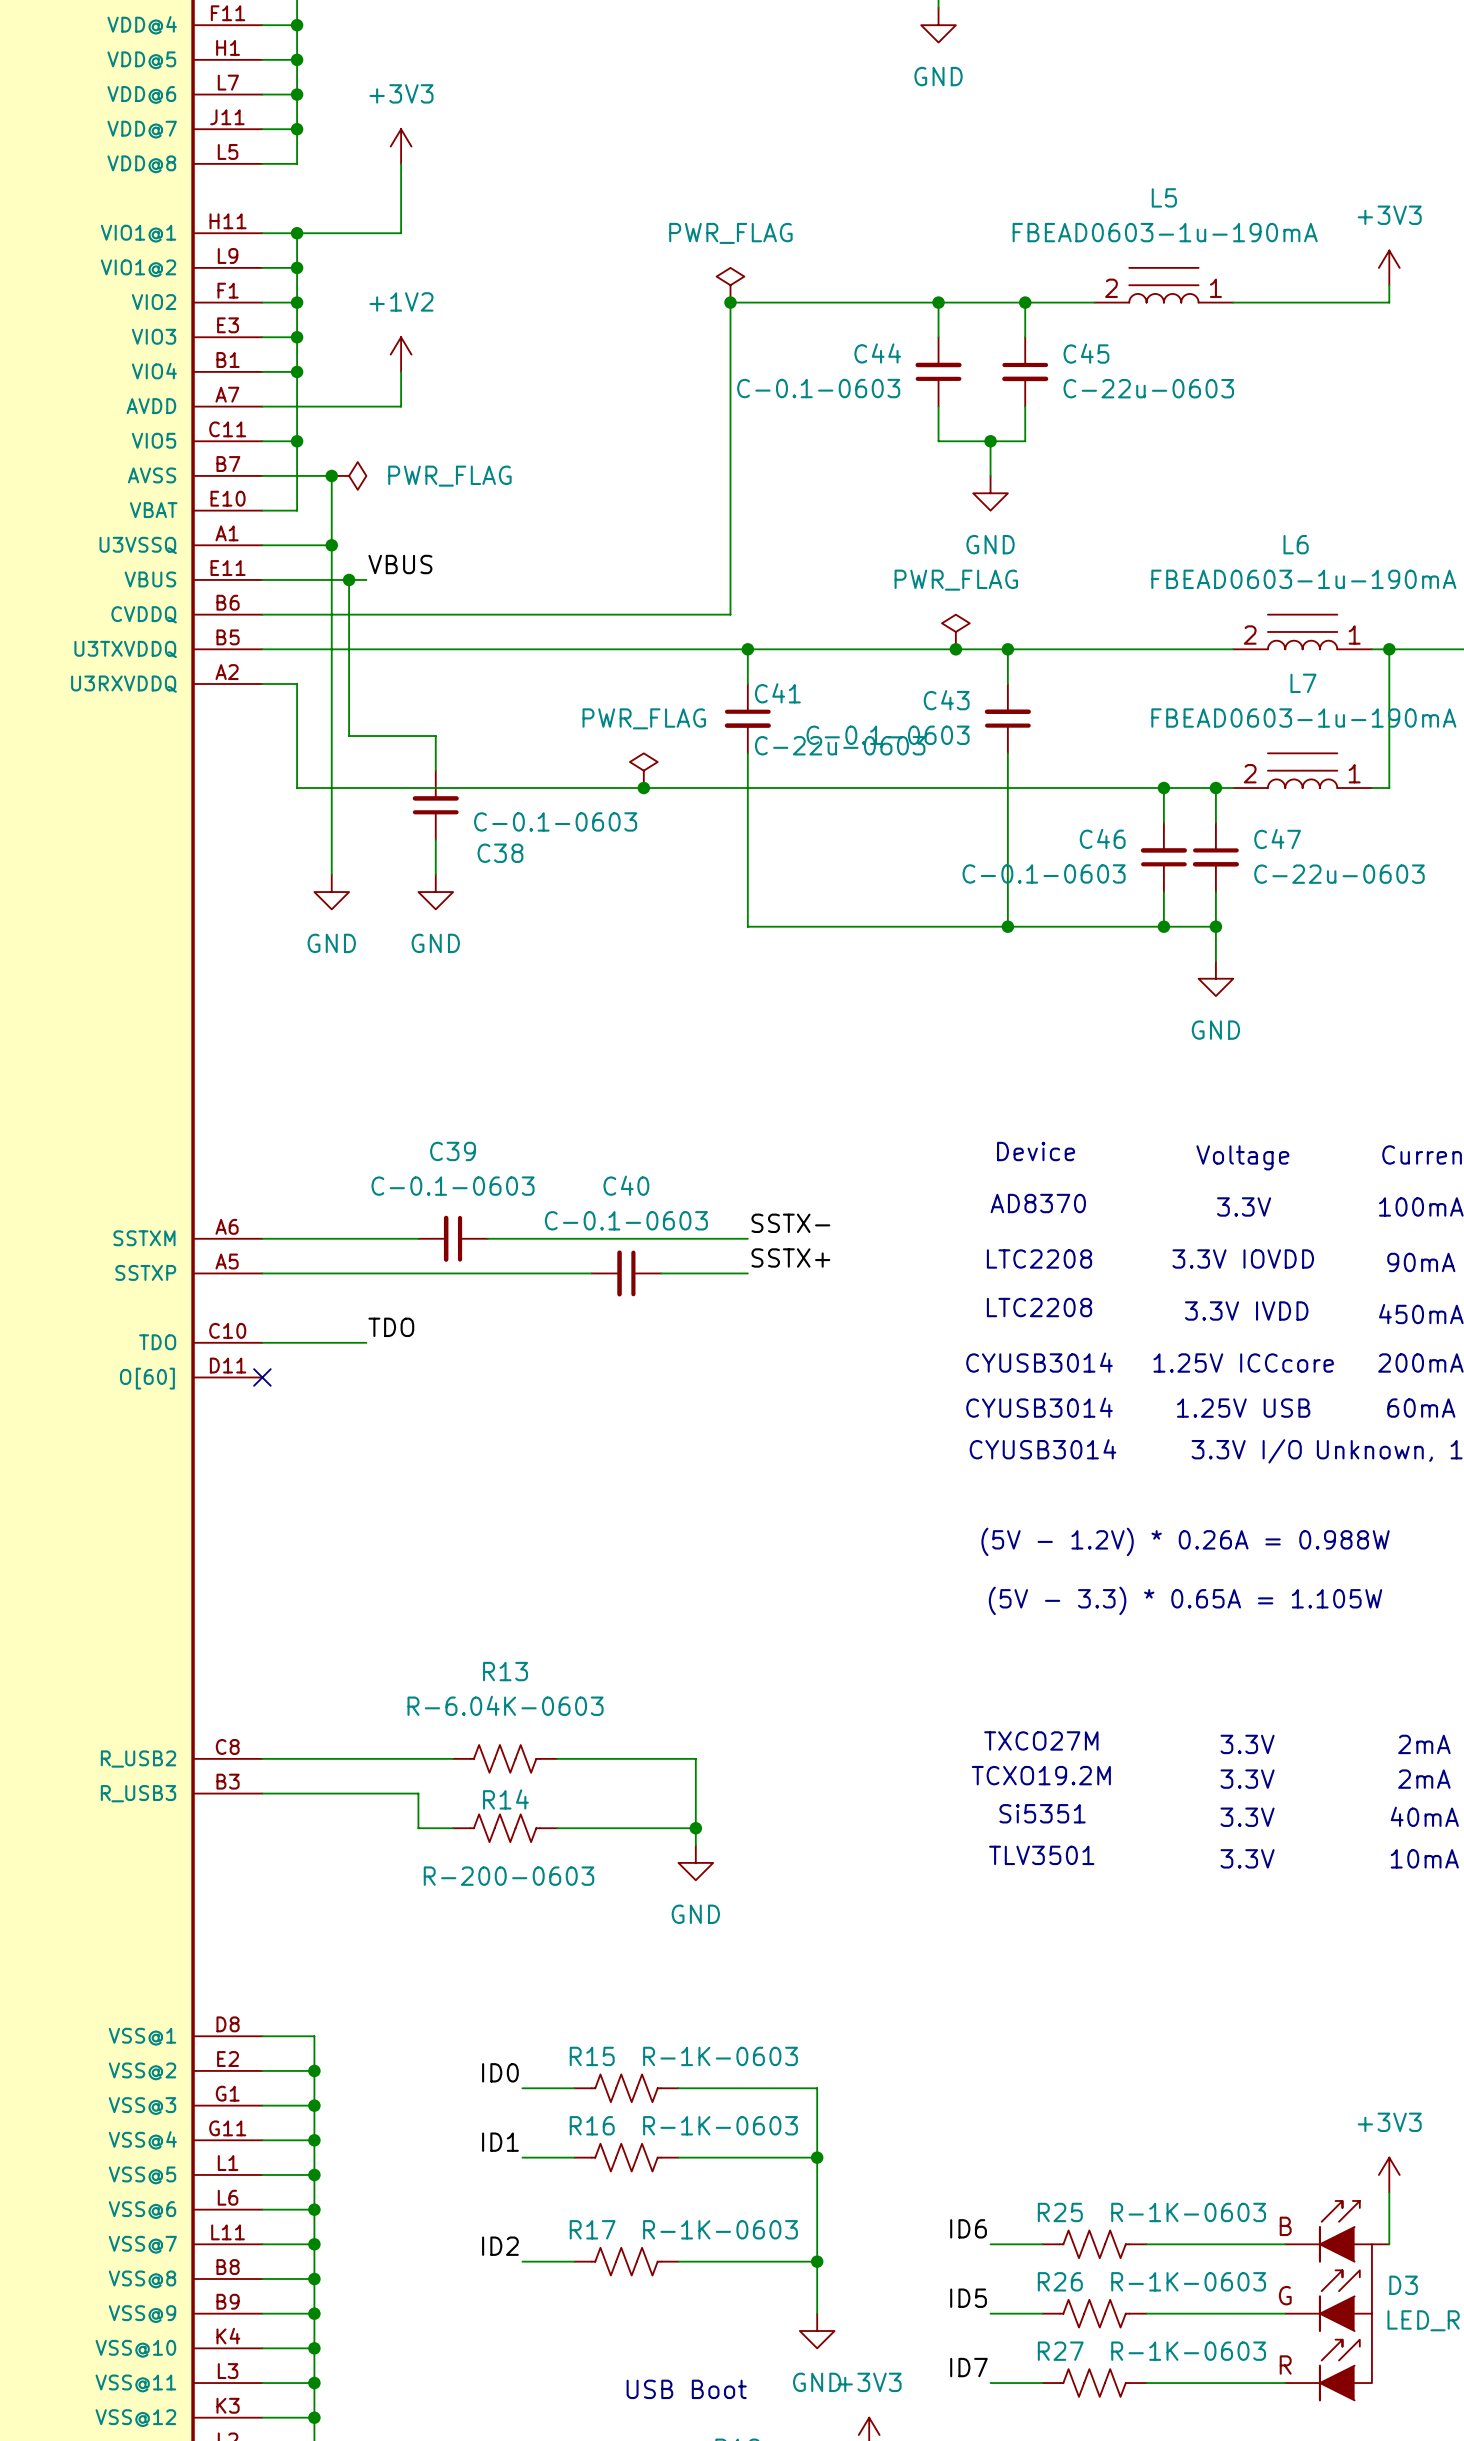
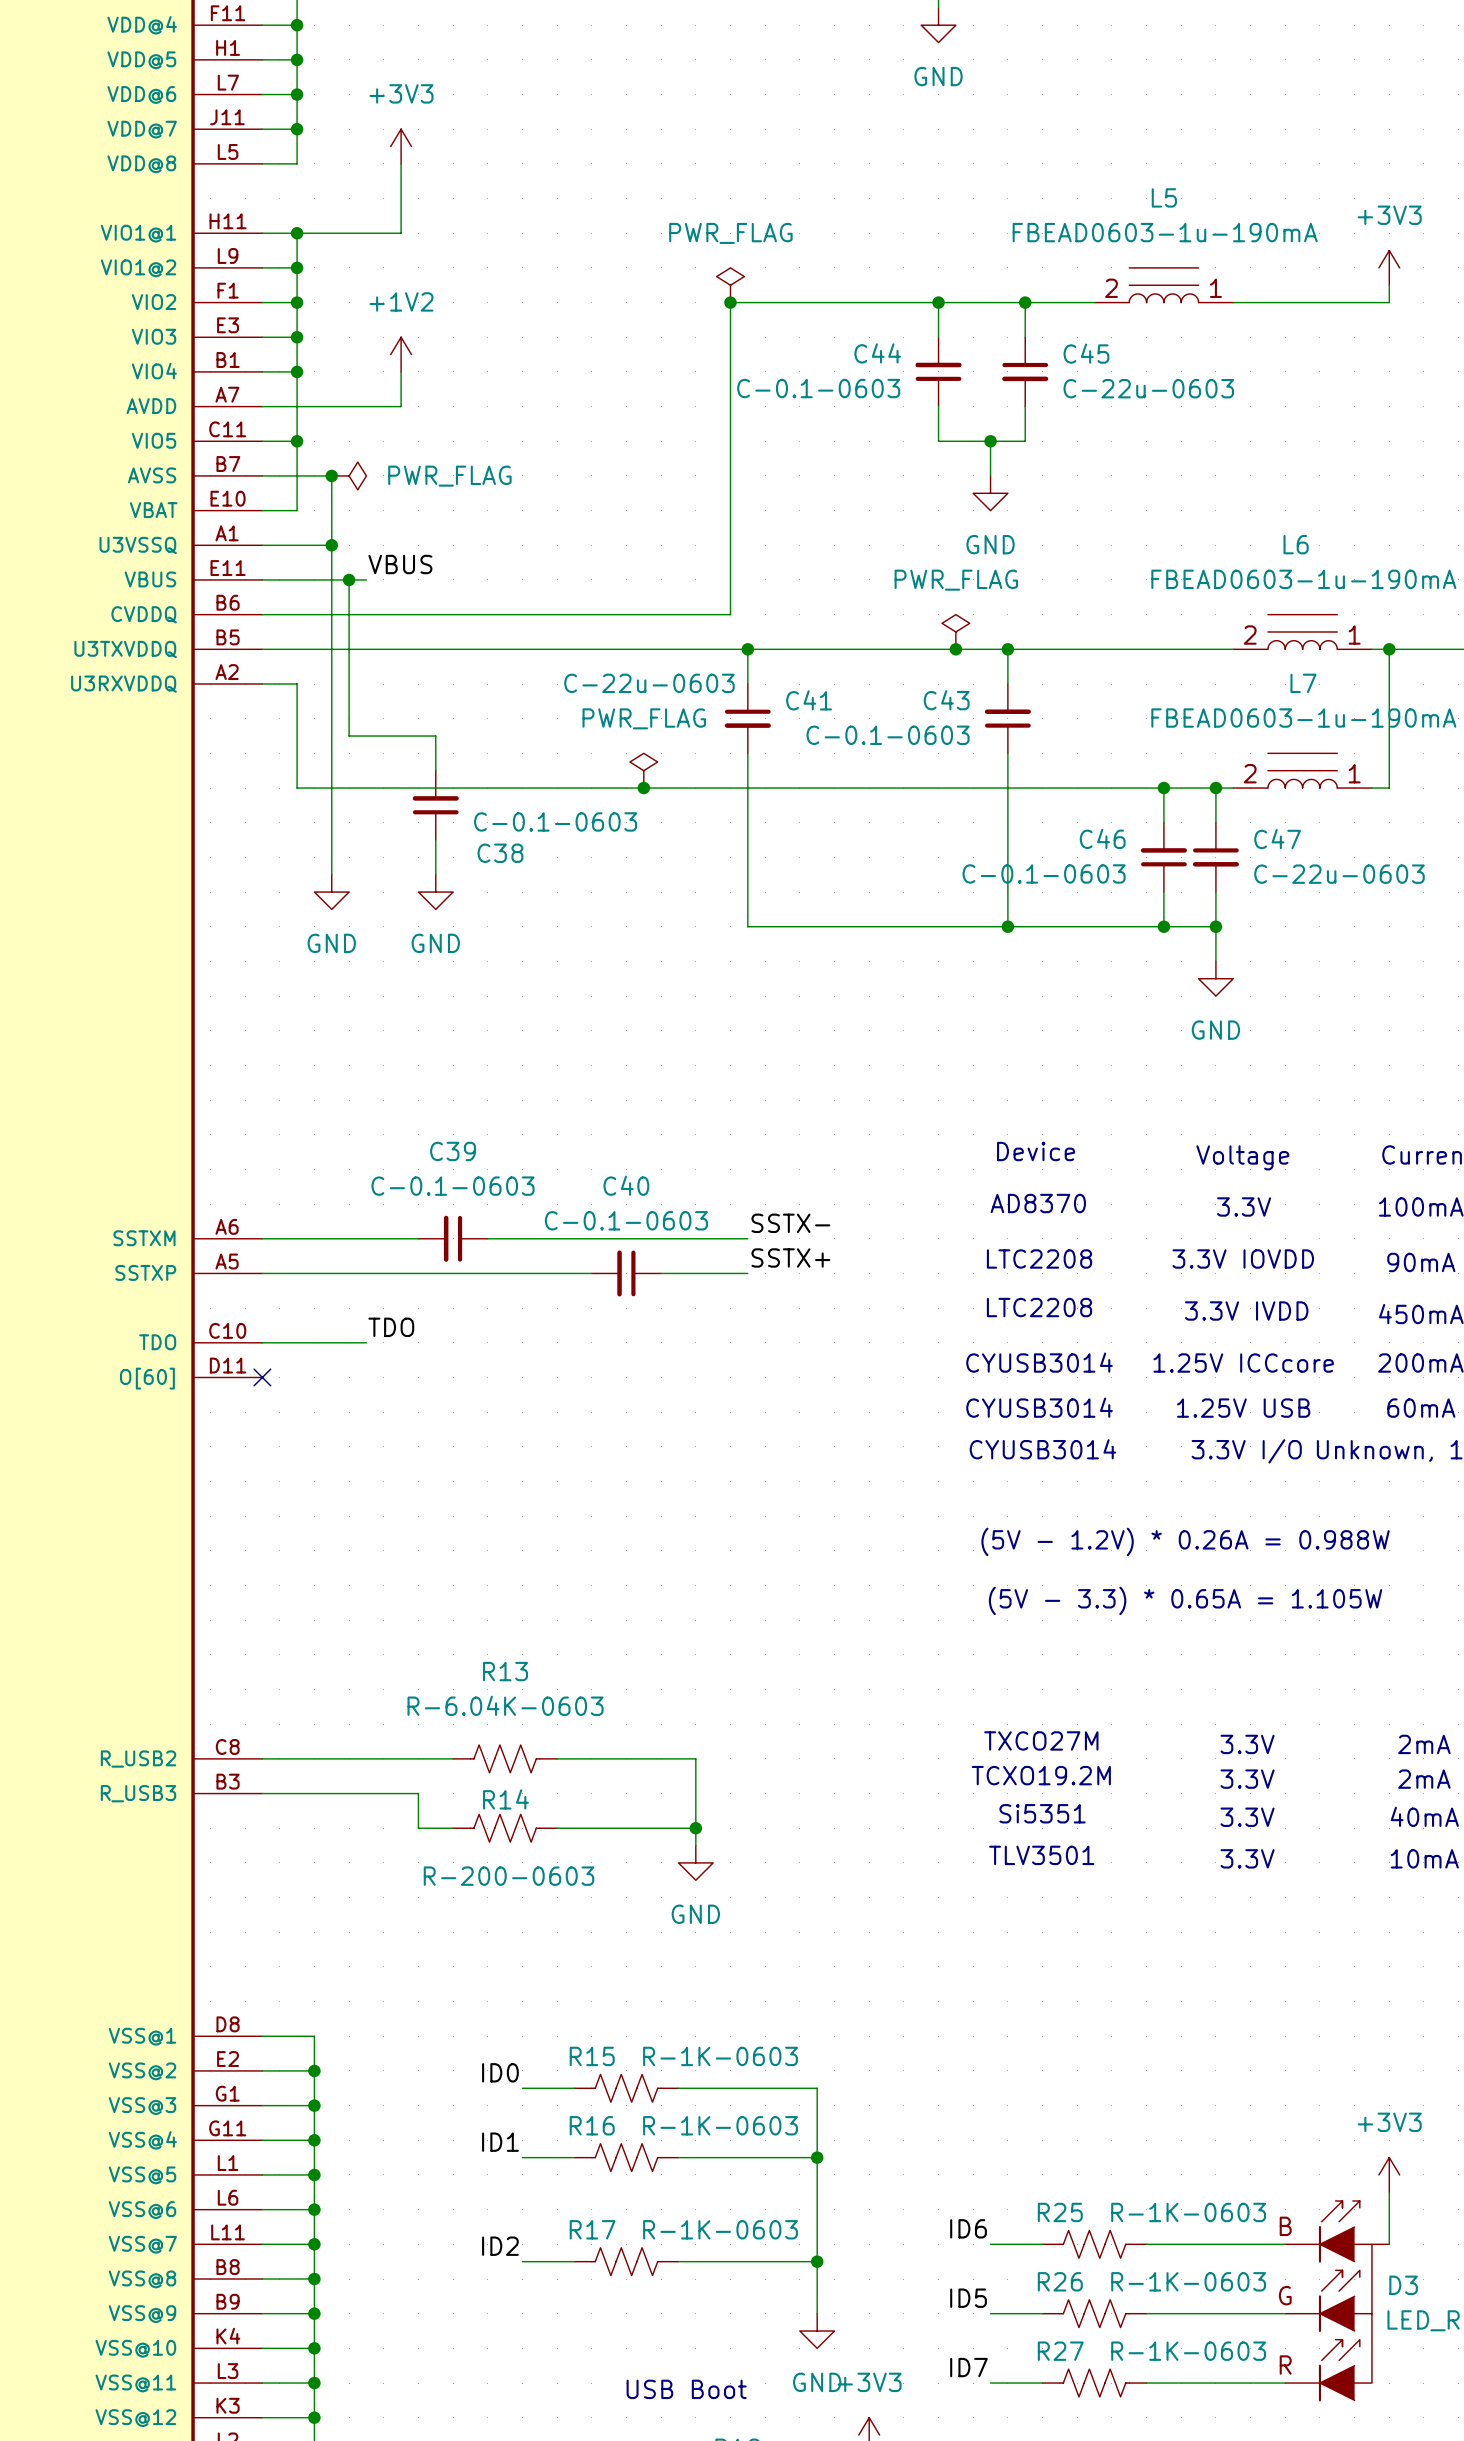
C41 name position: C41 (777, 693) -> C41 (809, 700)
C41 value position: C-22u-0603 (840, 745) -> C-22u-0603 (649, 683)

